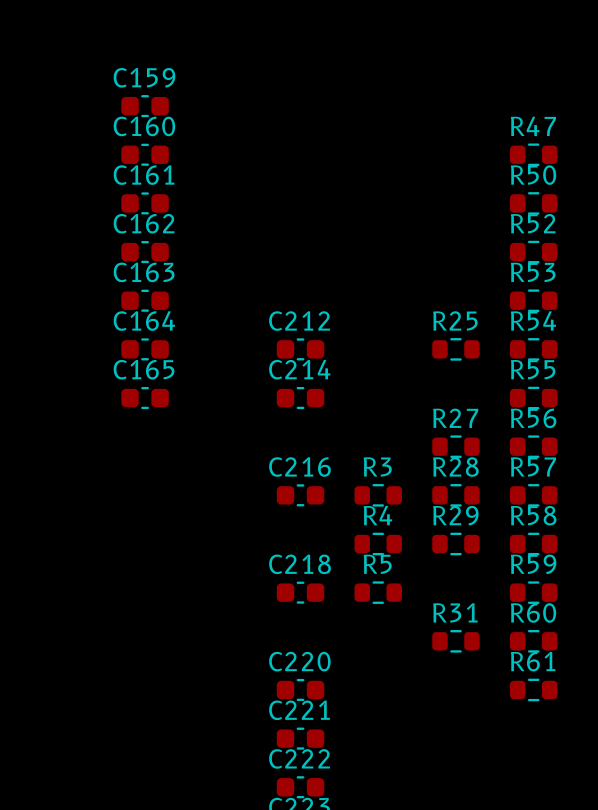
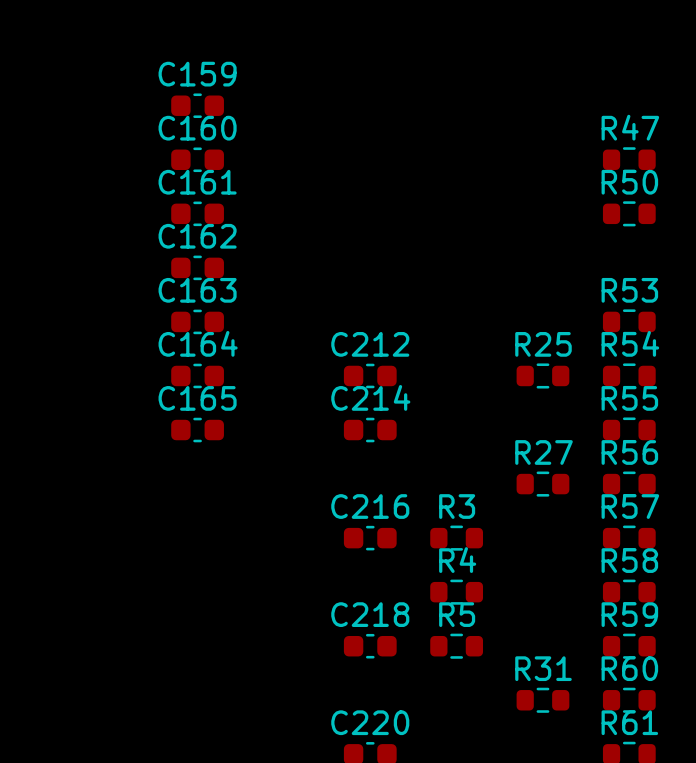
R52: (533, 252) -> none
R28: (455, 495) -> none
R29: (455, 543) -> none

